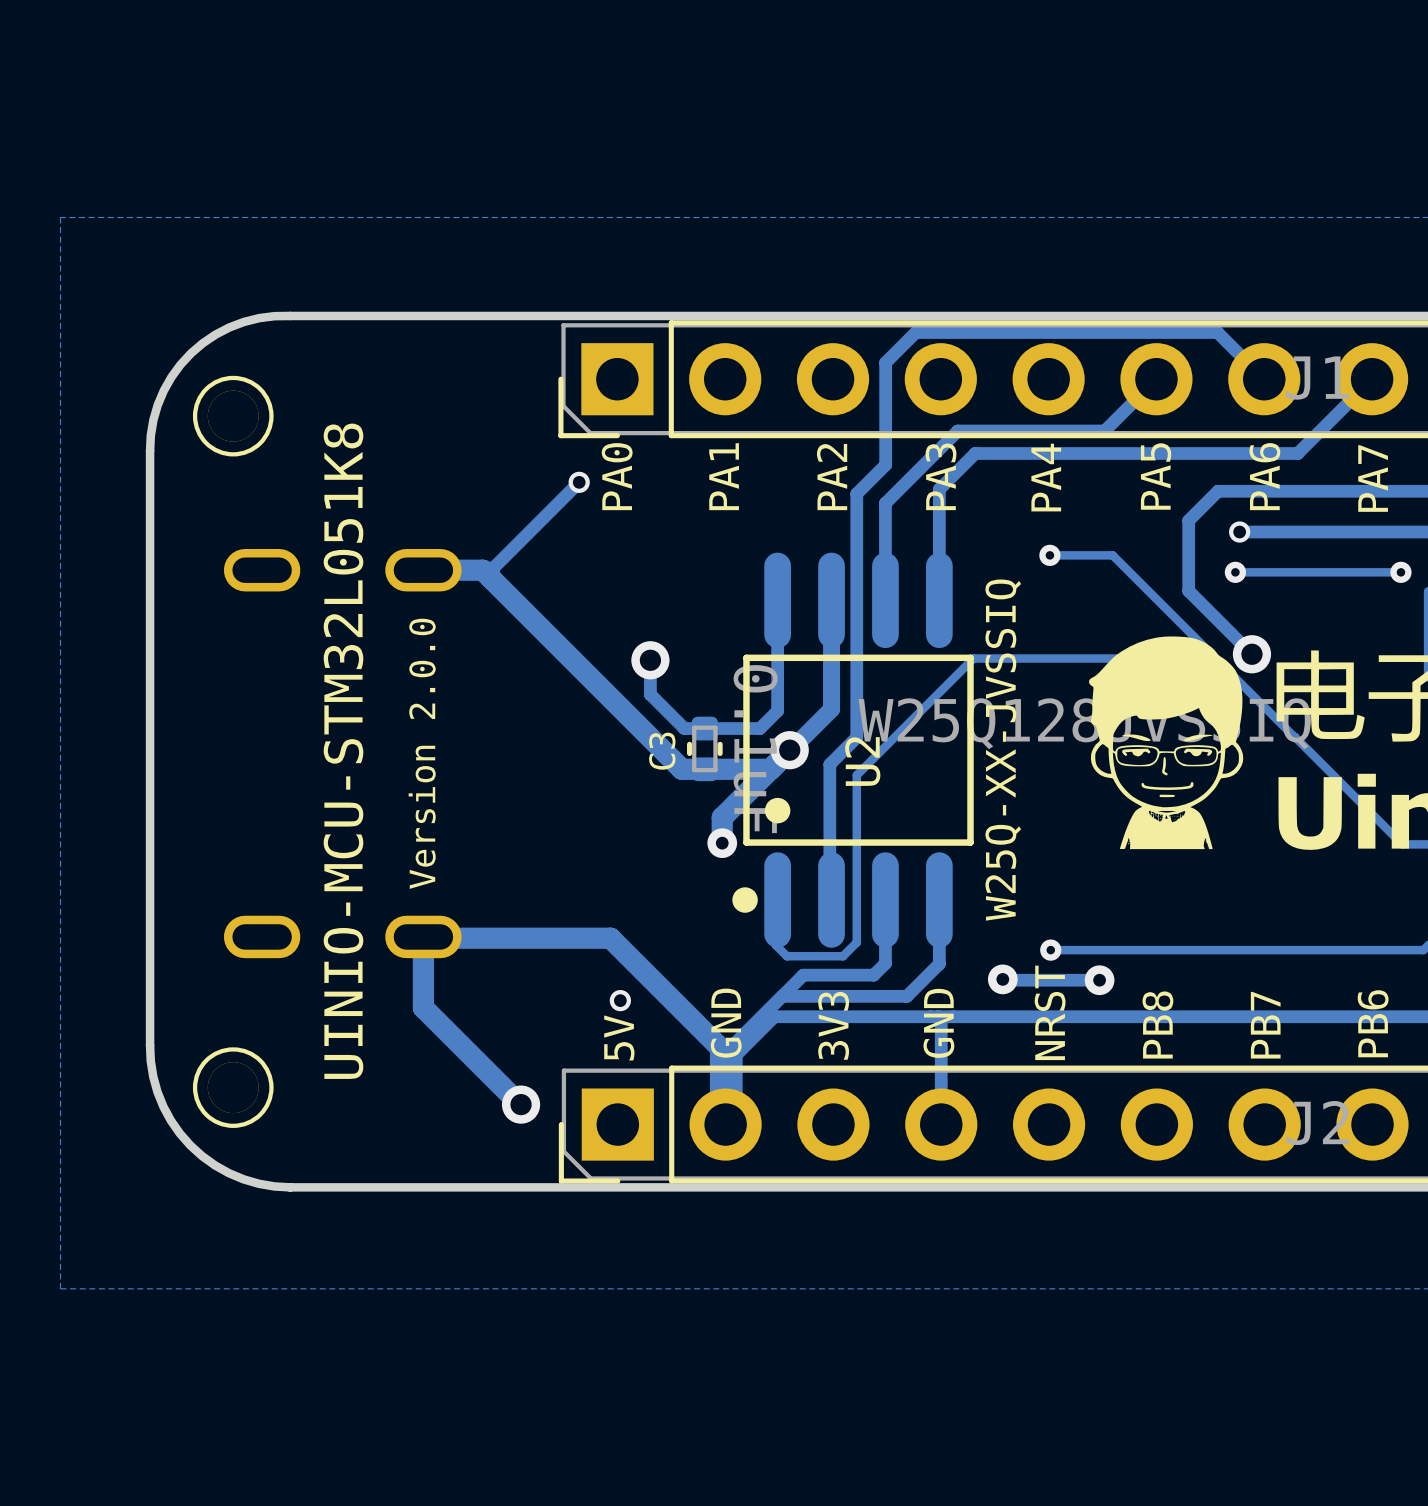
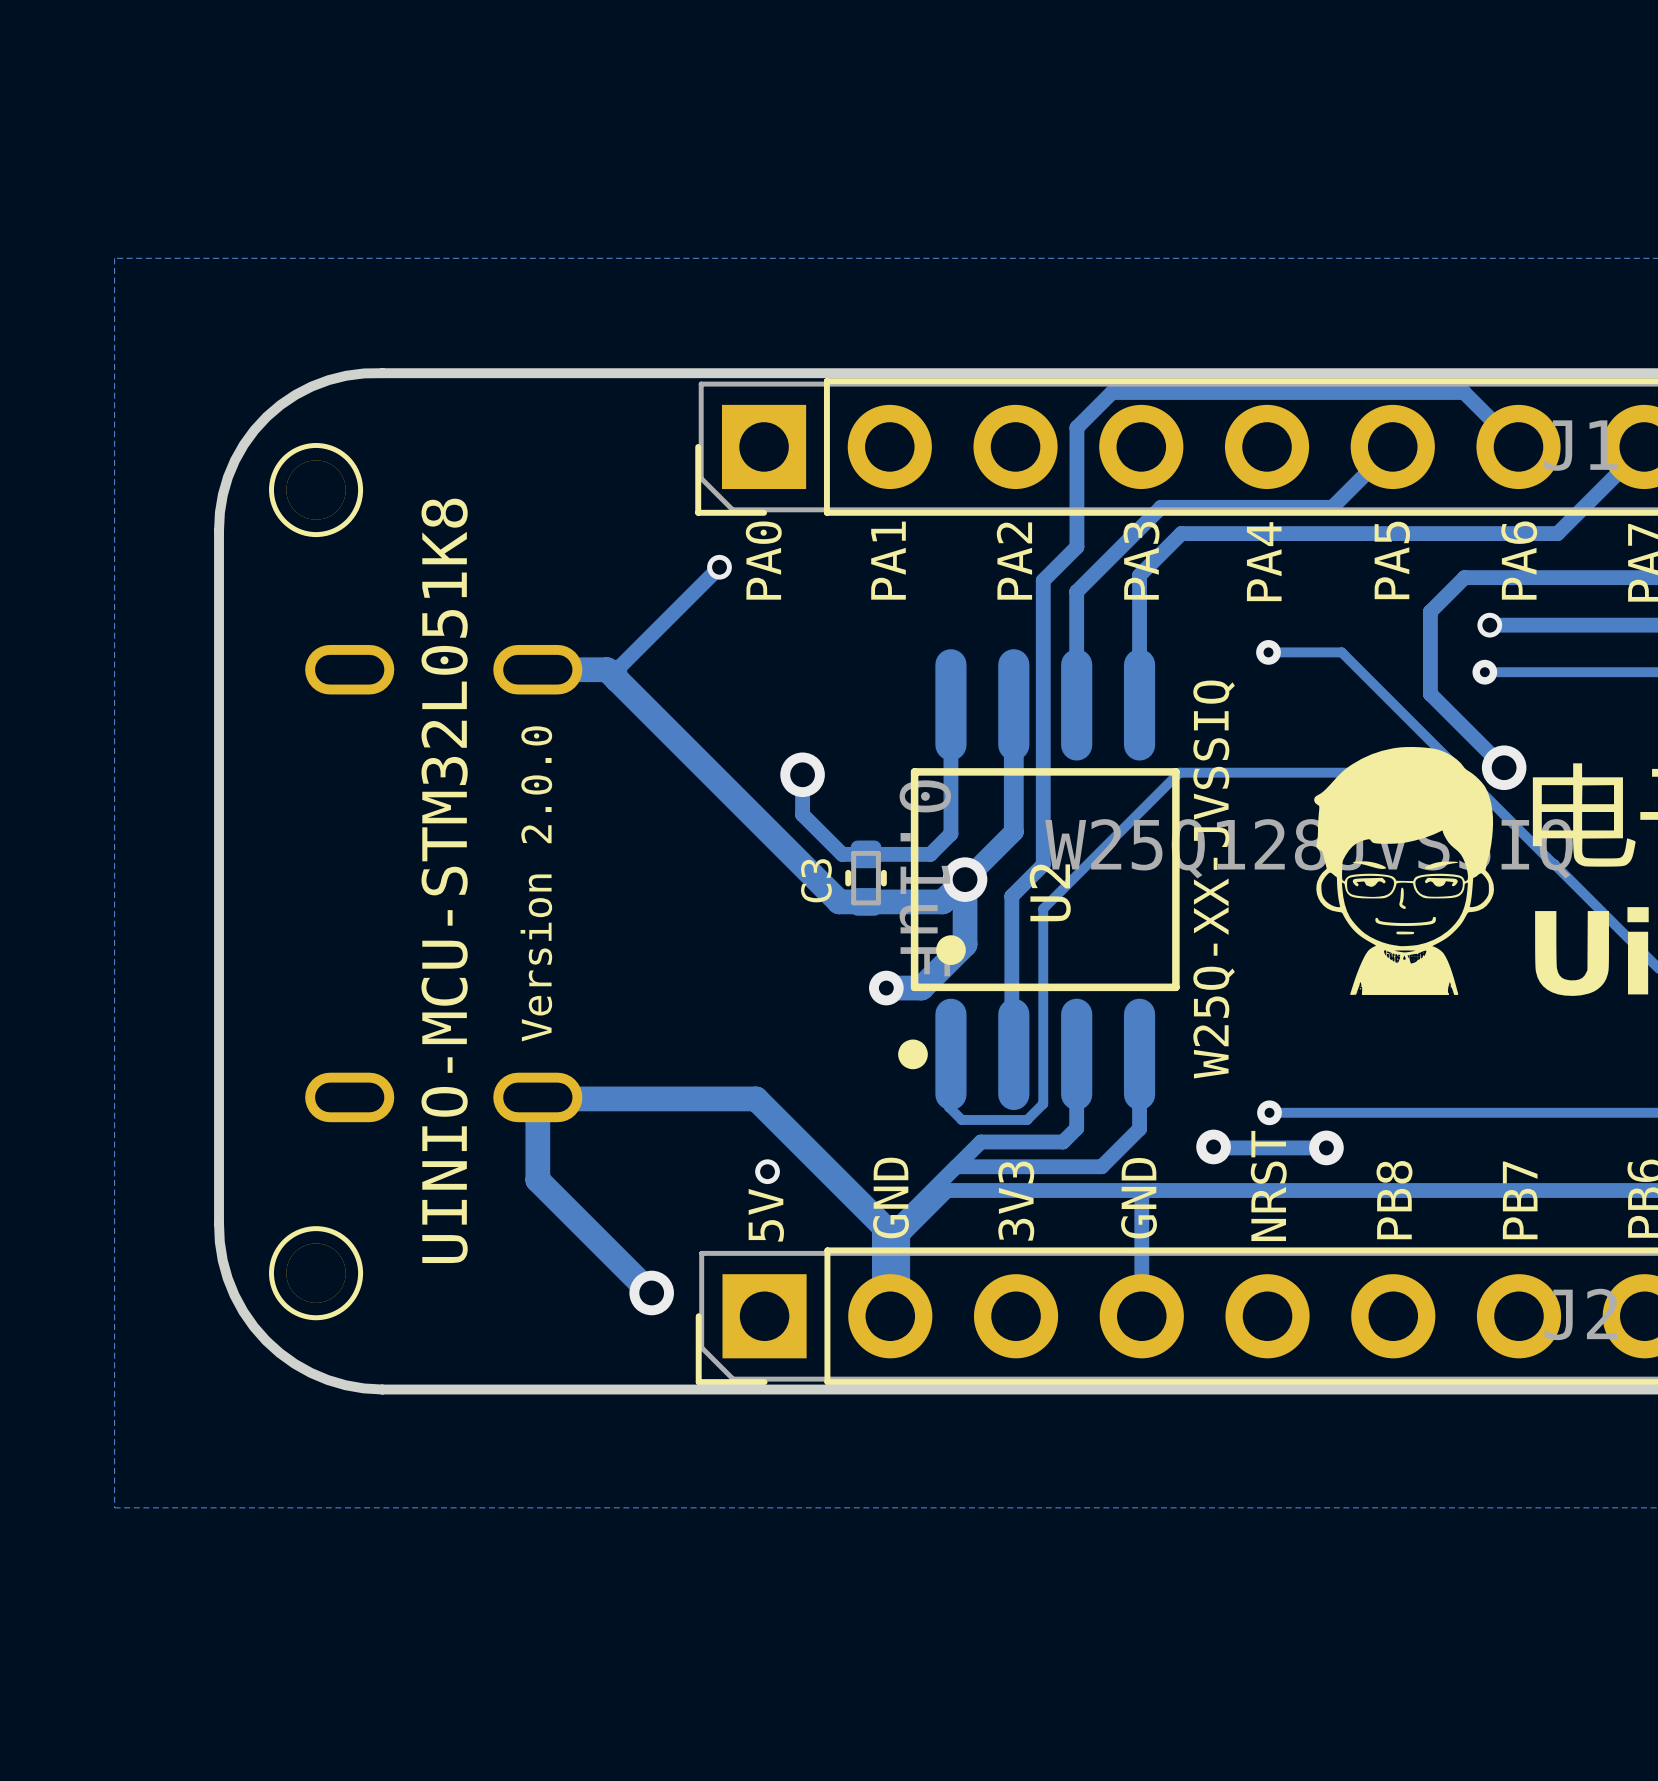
track: (770, 769) (722, 817) (722, 843) -> (965, 879) (965, 944) (921, 988) (886, 988)

